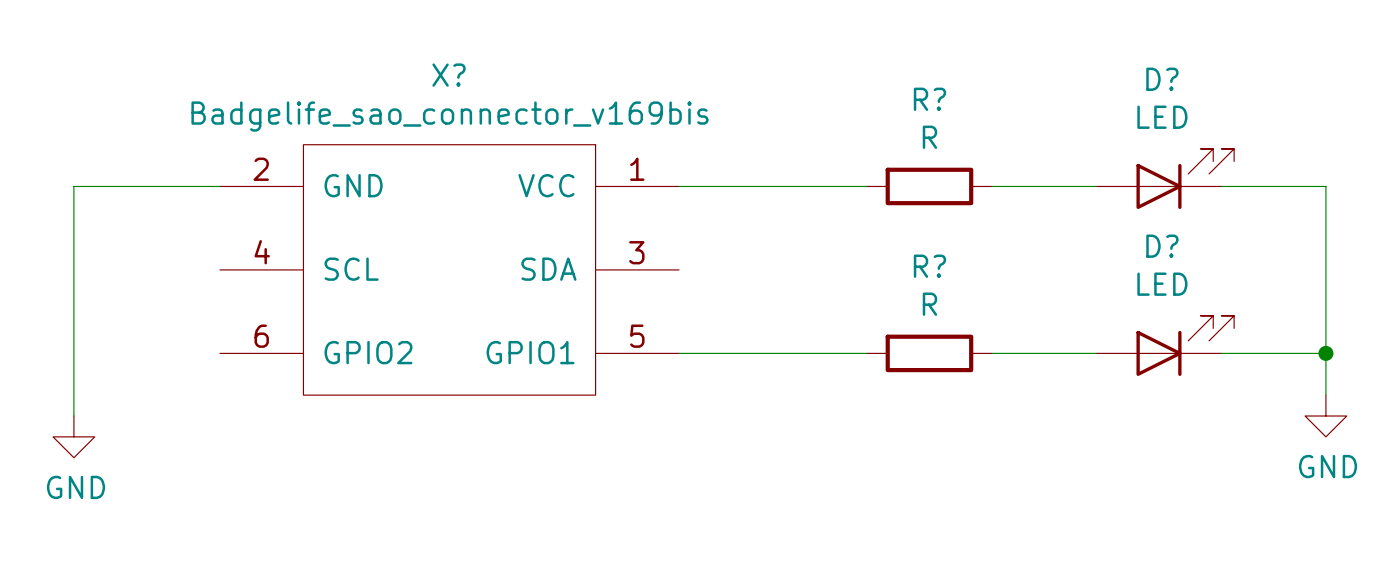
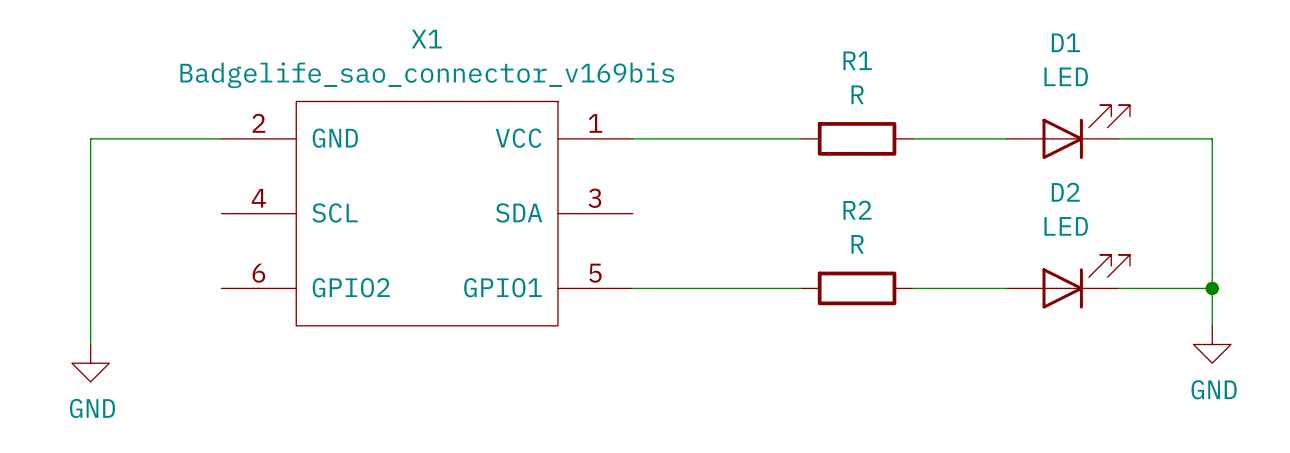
X? name: X? (449, 75) -> X1 (426, 39)
D? name: D? (1162, 79) -> D1 (1065, 42)
R? name: R? (929, 99) -> R1 (857, 60)
D? name: D? (1162, 246) -> D2 (1065, 192)
R? name: R? (929, 266) -> R2 (857, 210)

